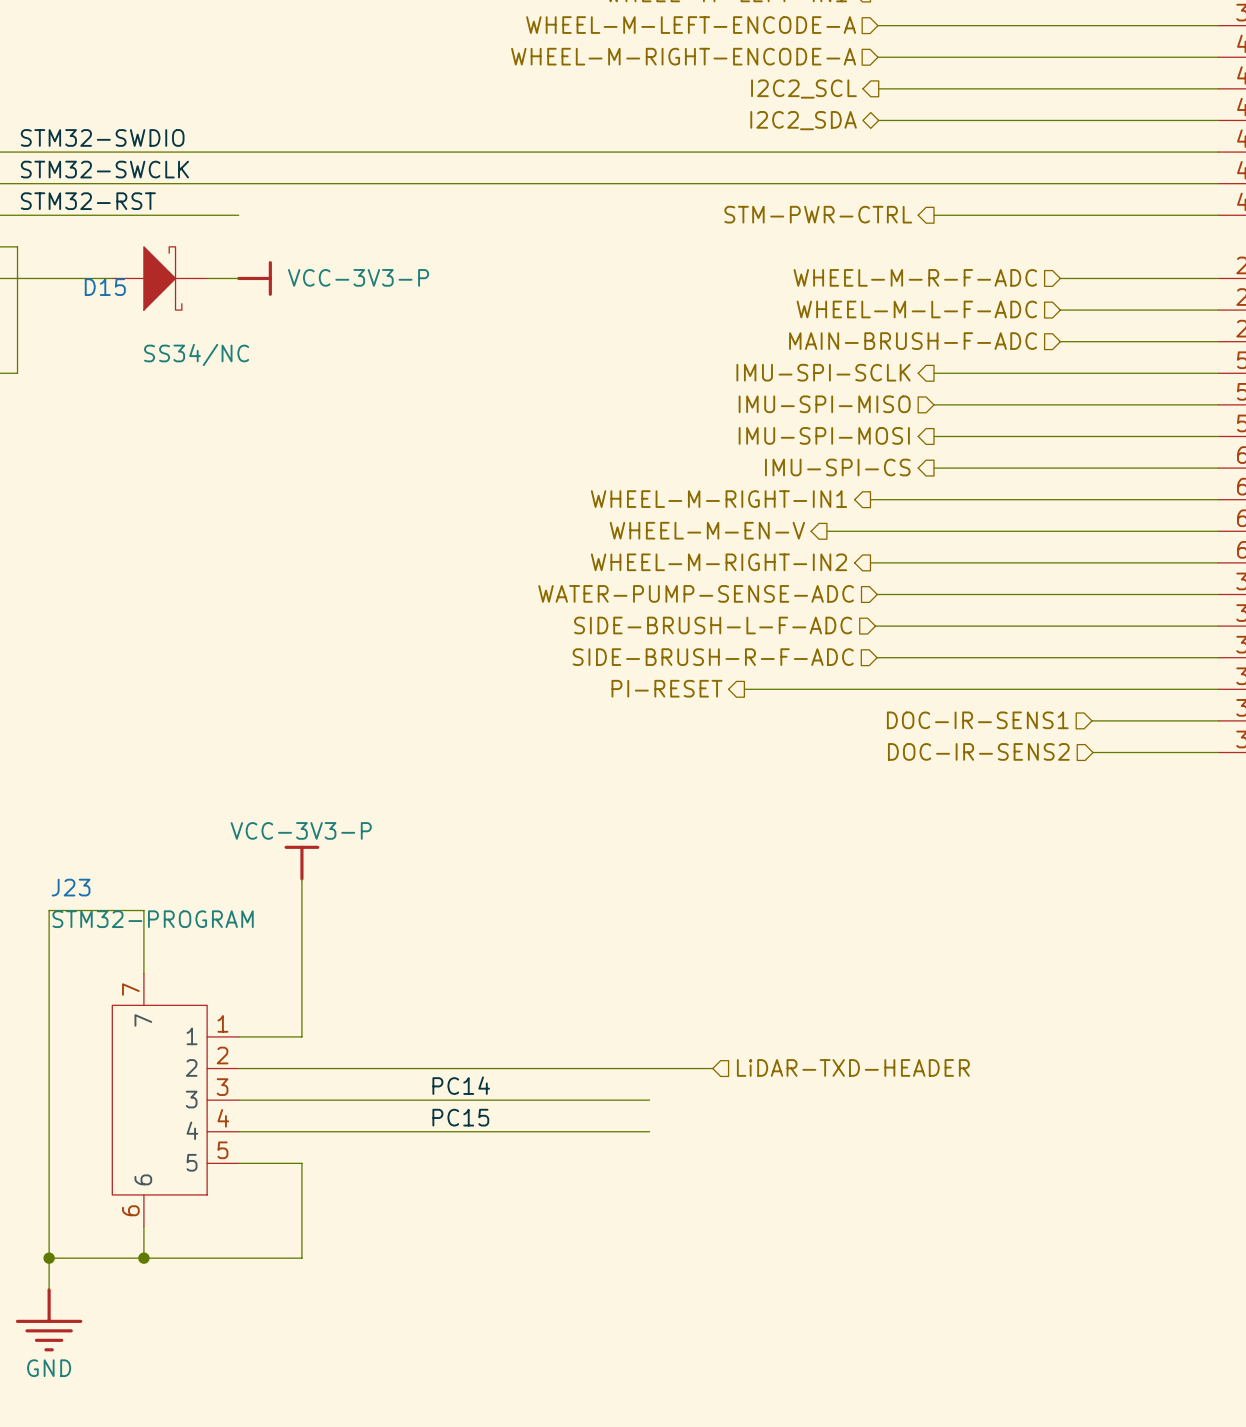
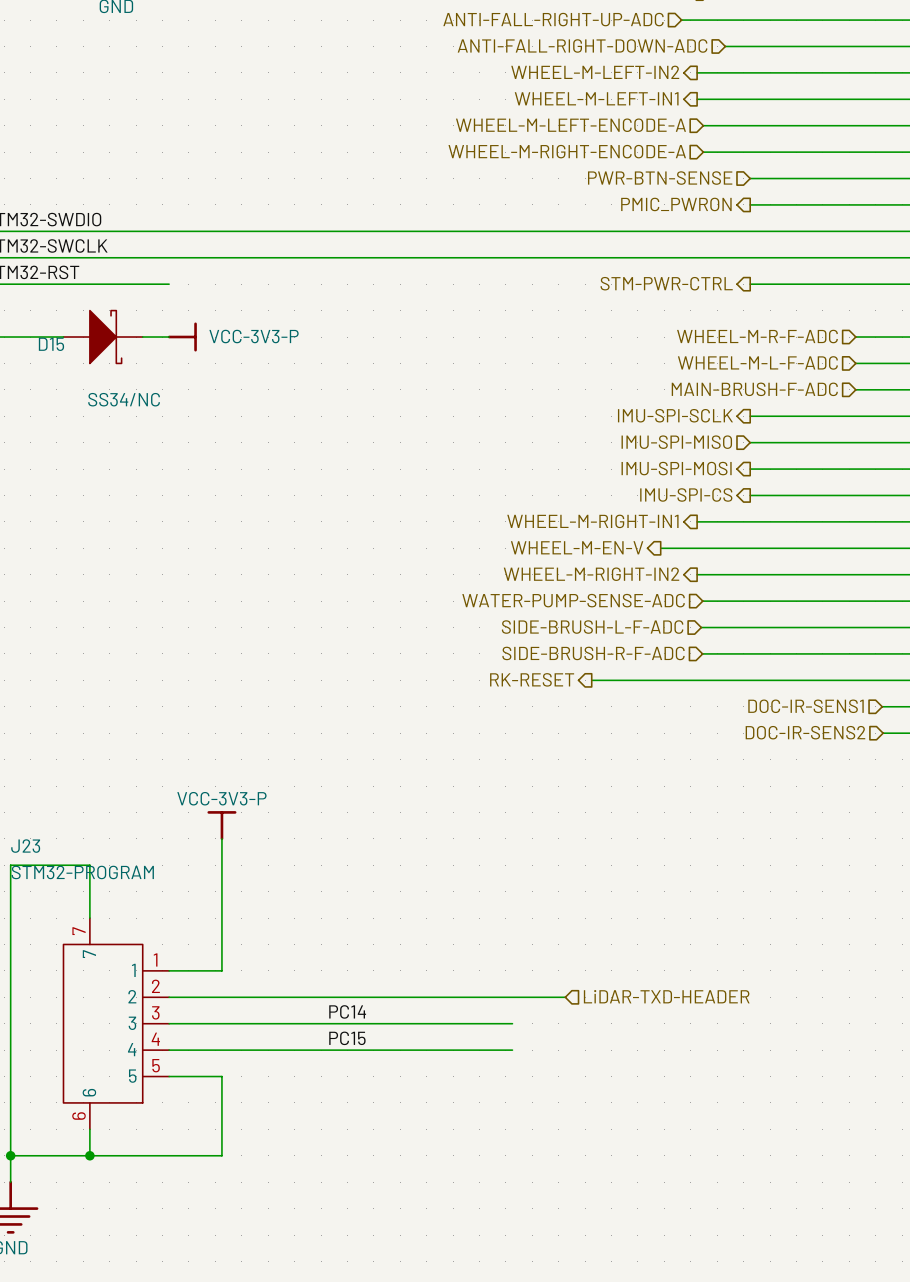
hierarchical label: none -> PWR-BTN-SENSE (660, 178)
wire: (878, 88) (934, 88) -> none
hierarchical label: I2C2_SCL (803, 89) -> none
hierarchical label: I2C2_SDA (803, 120) -> none
hierarchical label: none -> PMIC_PWRON (676, 204)
wire: (878, 120) (934, 120) -> none
hierarchical label: PI-RESET (667, 688) -> RK-RESET (532, 679)

